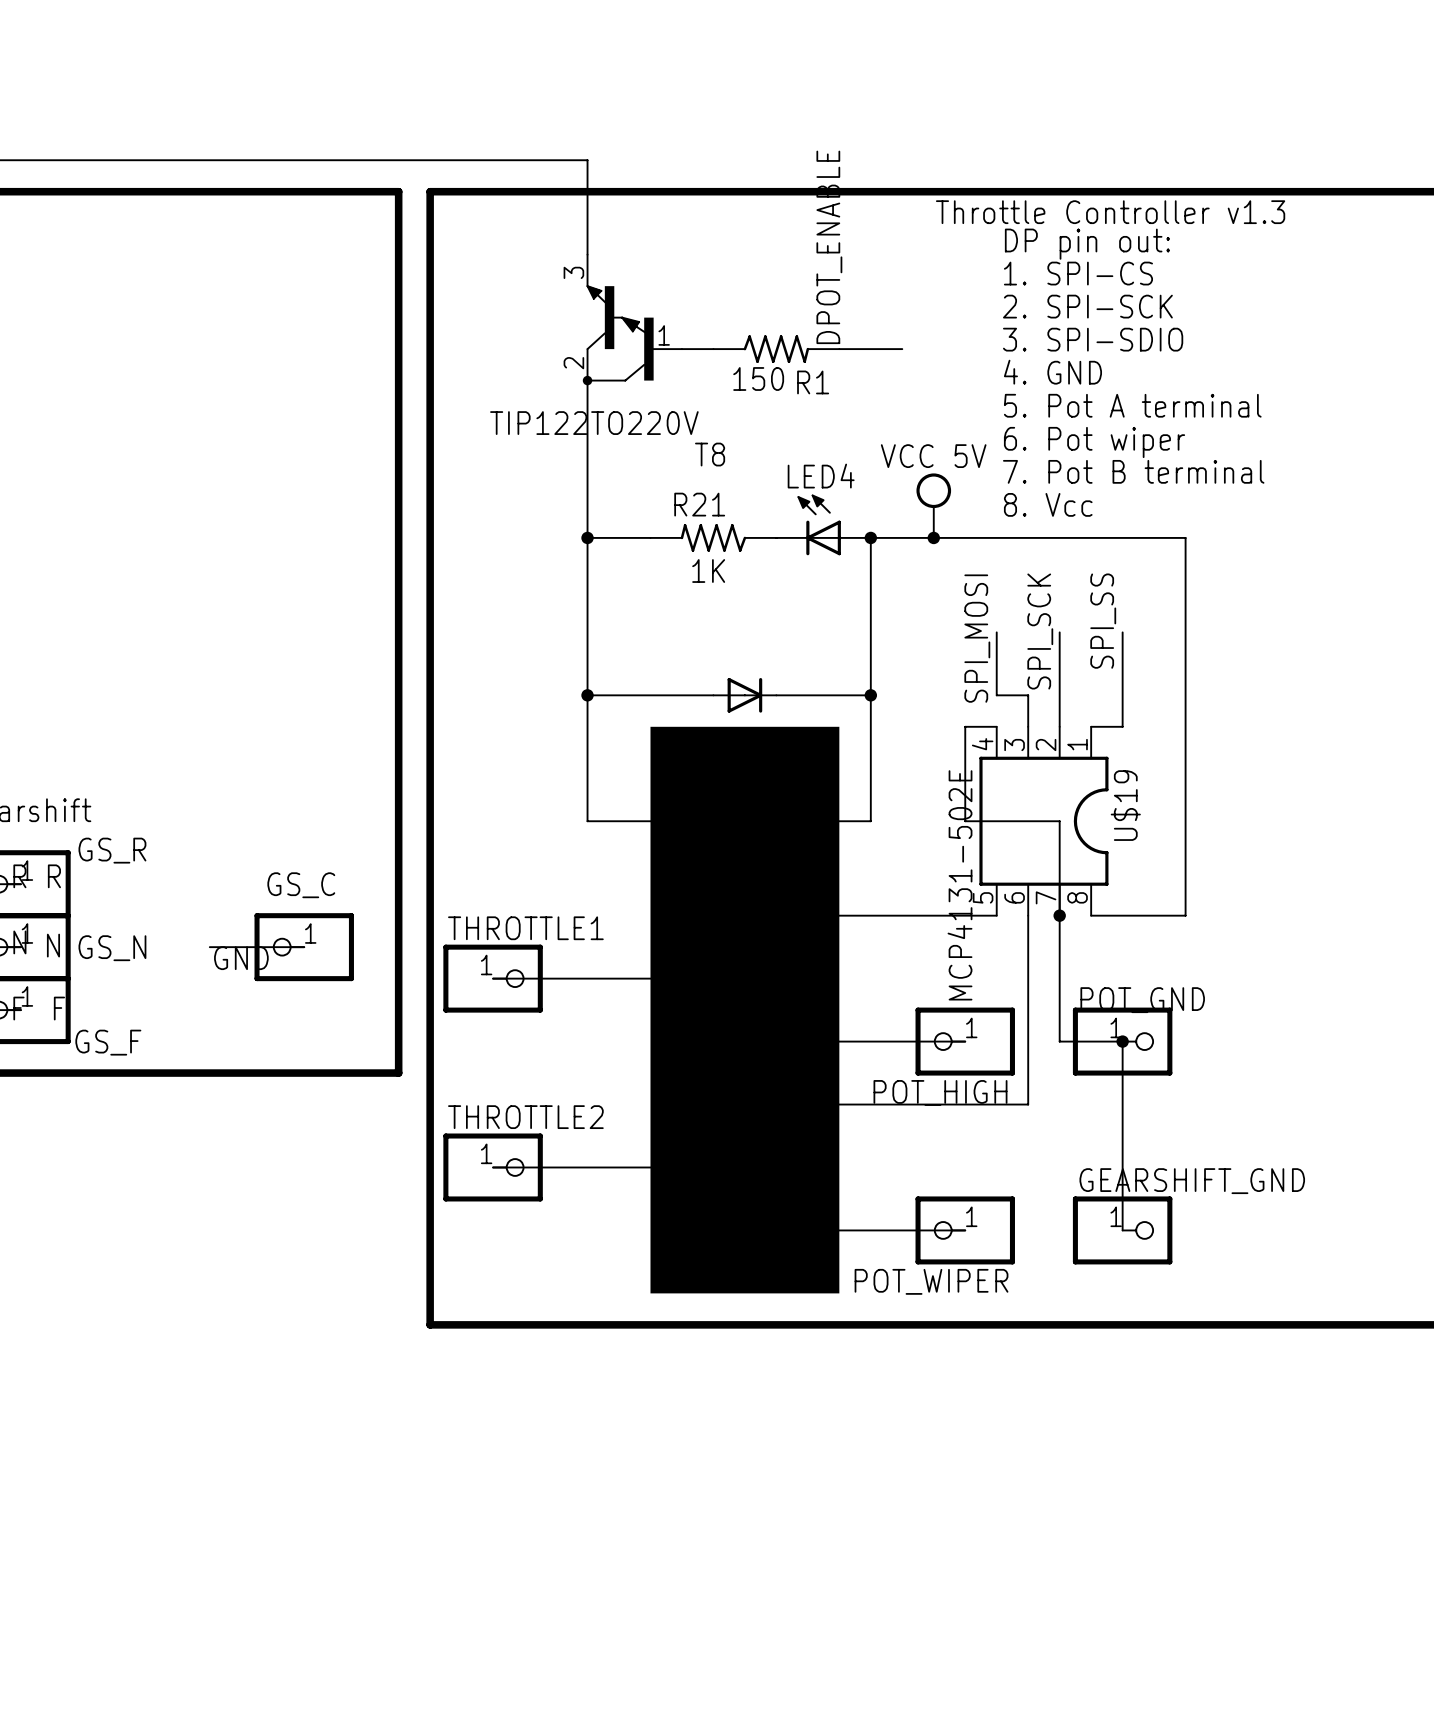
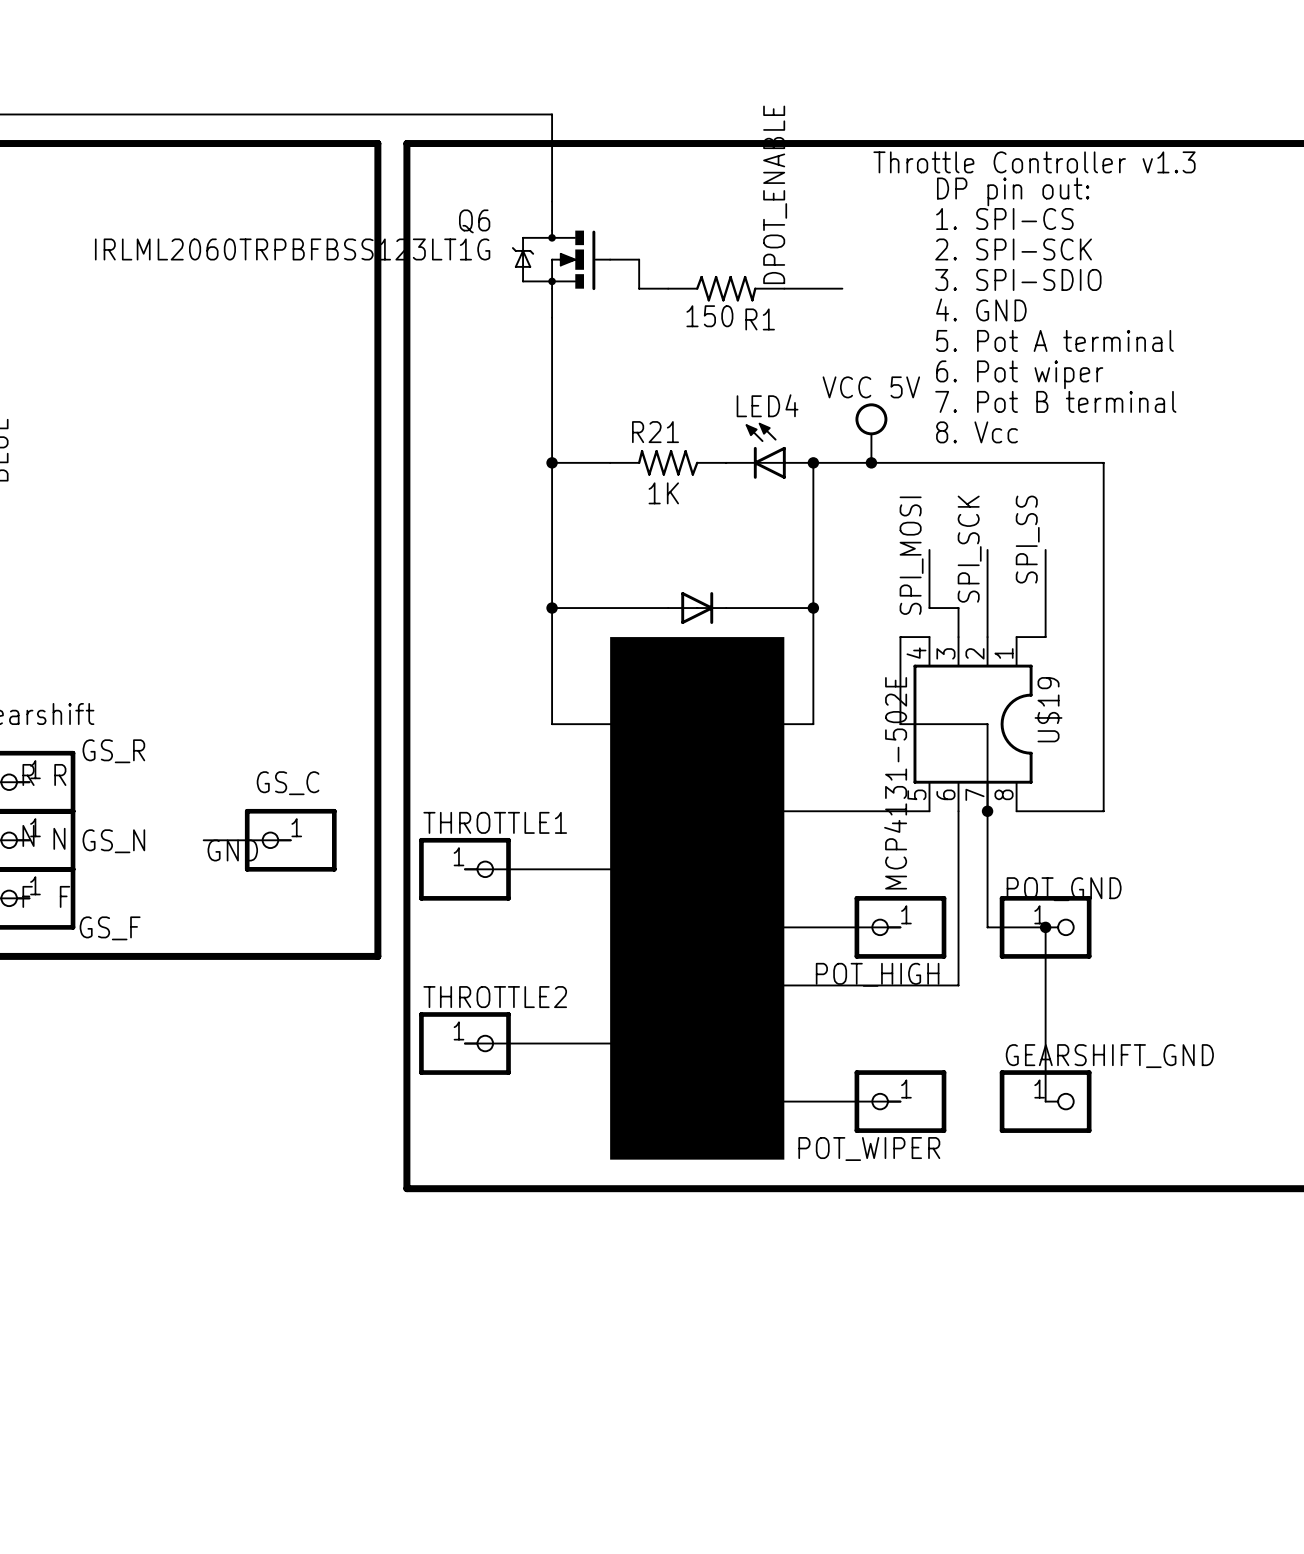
Q6: none -> IRLML2060TRPBFBSS123LT1G (575, 259)
wire: none -> (639, 259) (639, 288)
T8: TIP122TO220V (632, 319) -> none

